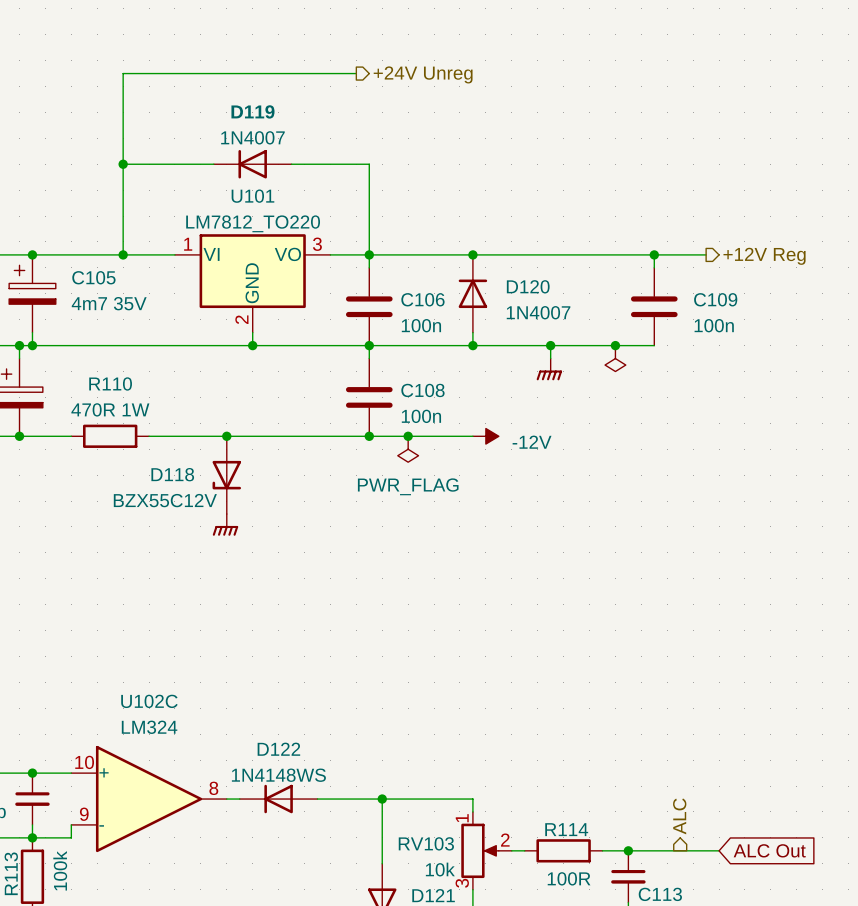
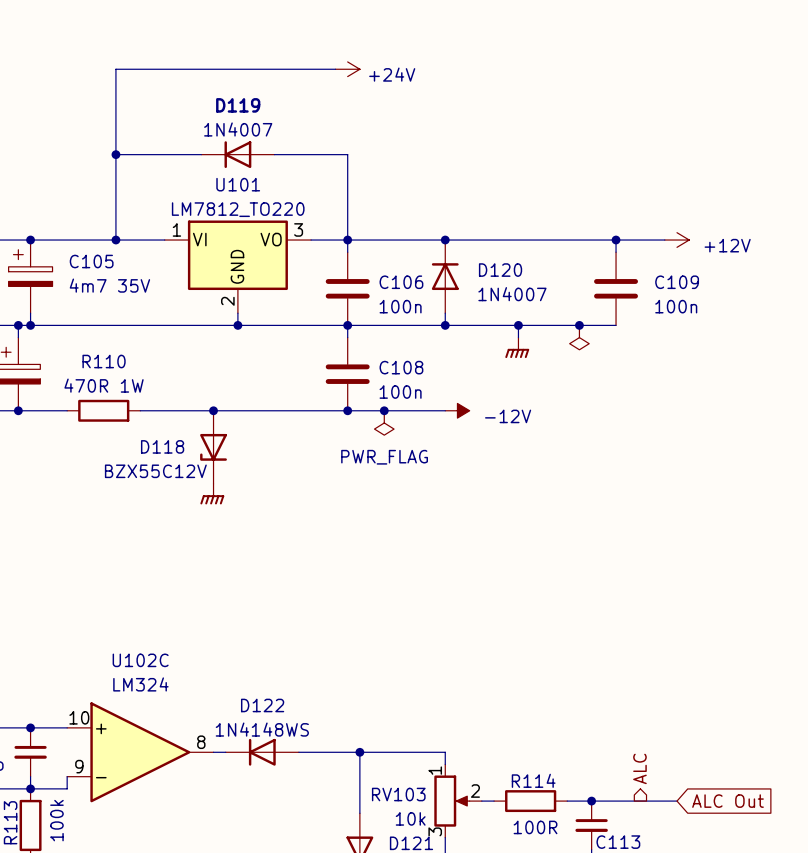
power symbol: none -> +24V (347, 69)
hierarchical label: +24V Unreg (423, 74) -> none
power symbol: none -> +12V (677, 240)
hierarchical label: +12V Reg (764, 256) -> none

